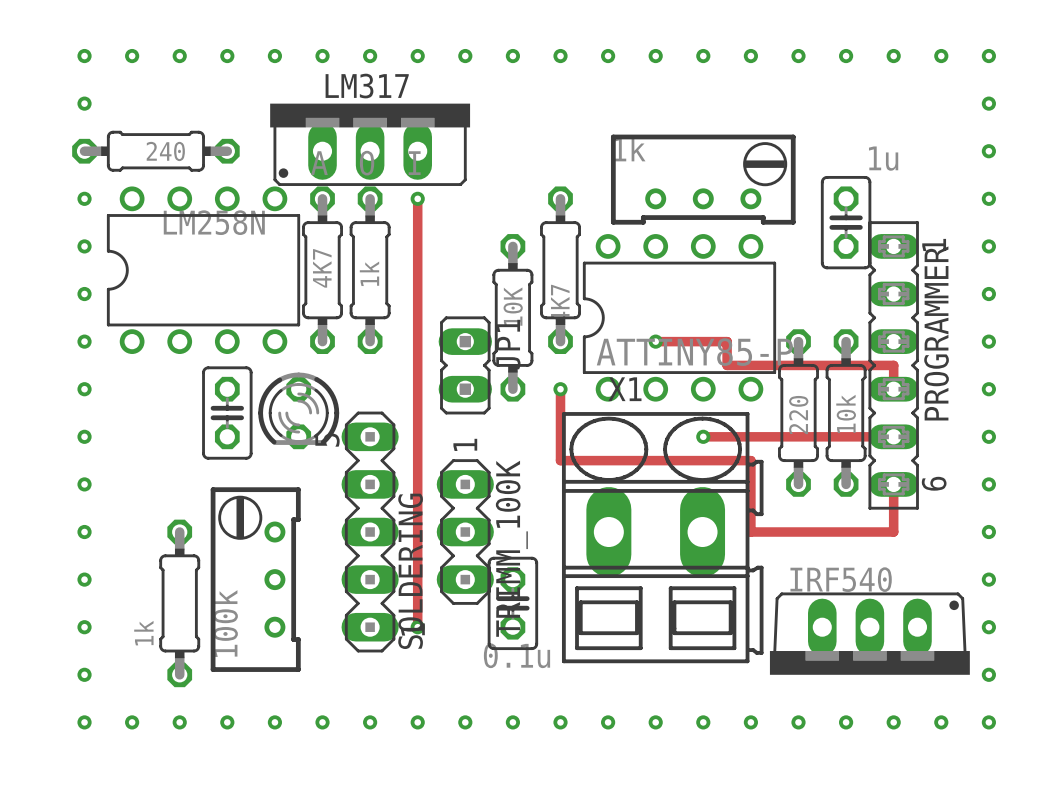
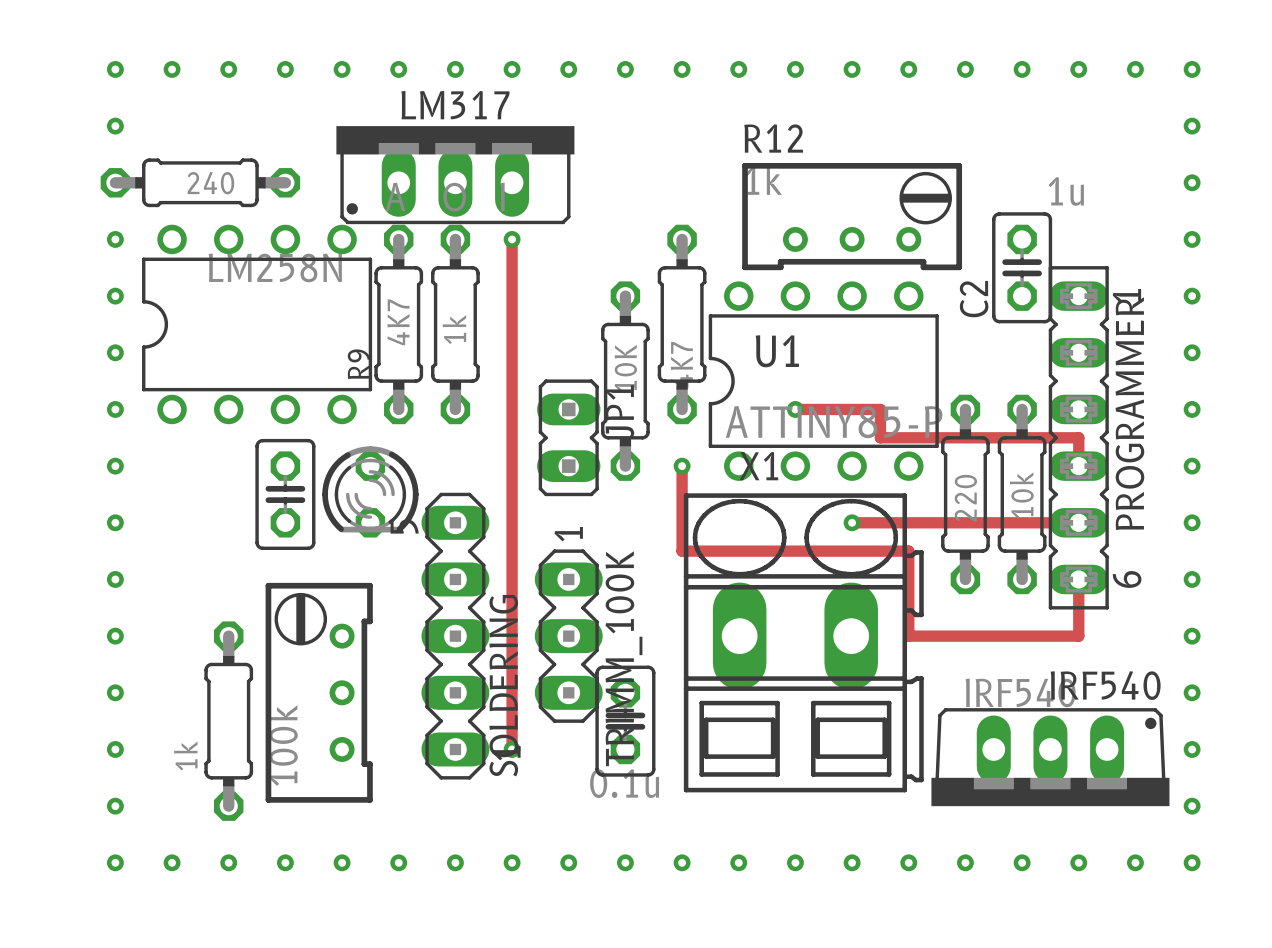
R12 name: none -> R12 (773, 138)
C2 name: none -> C2 (974, 299)
U1 name: none -> U1 (777, 351)
R9 name: none -> R9 (358, 364)
IRF540 name: none -> IRF540 (1105, 685)

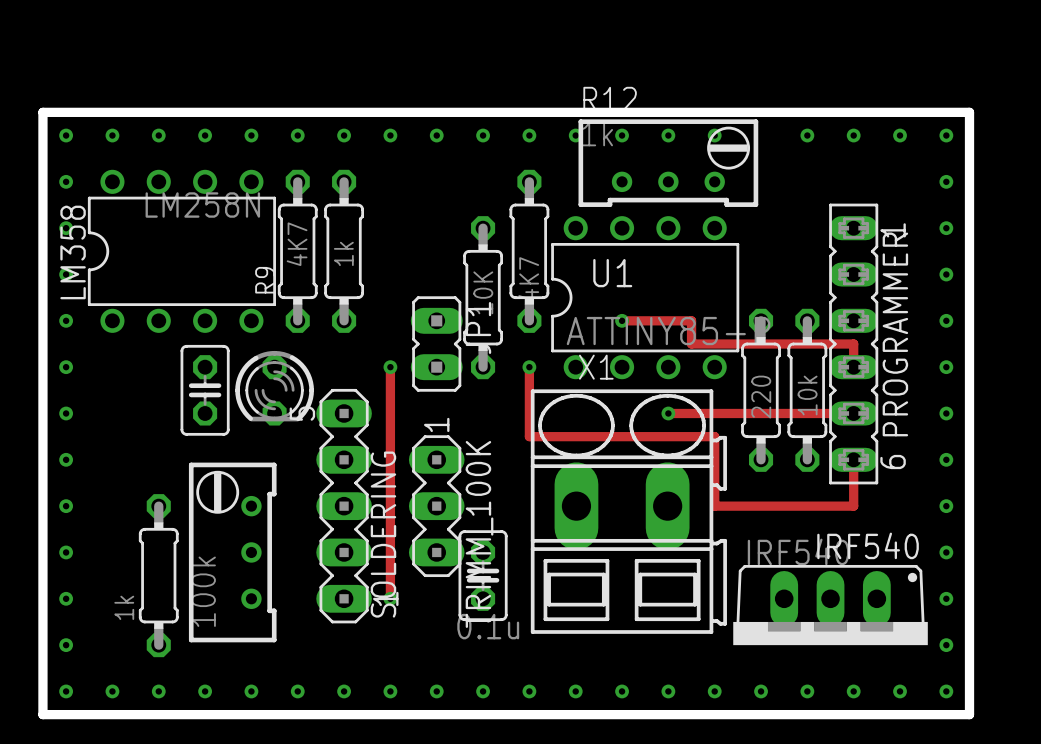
via: (115, 69) -> none
via: (172, 69) -> none
via: (228, 69) -> none
via: (285, 69) -> none
via: (342, 69) -> none
via: (398, 69) -> none
via: (455, 69) -> none
via: (512, 69) -> none
via: (568, 69) -> none
via: (625, 69) -> none
via: (682, 69) -> none
via: (738, 69) -> none
via: (795, 69) -> none
via: (852, 69) -> none
via: (908, 69) -> none
via: (965, 69) -> none
via: (1022, 69) -> none
via: (1078, 69) -> none
via: (1135, 69) -> none
via: (1192, 69) -> none
via: (115, 126) -> none
via: (1192, 126) -> none
board edge: none -> (42, 112) (969, 112) (969, 714) (42, 714) (42, 112)
LM317: (455, 175) -> none
via: none -> (66, 135)
via: none -> (112, 135)
part: 240 (200, 182) -> none
via: none -> (158, 135)
via: none -> (205, 135)
via: none -> (251, 135)
via: none -> (297, 135)
via: none -> (344, 135)
via: none -> (390, 135)
via: none -> (436, 135)
via: none -> (483, 135)
via: none -> (529, 135)
via: none -> (575, 135)
via: none -> (622, 135)
via: none -> (668, 135)
via: none -> (714, 135)
via: none -> (807, 135)
via: none -> (853, 135)
via: none -> (900, 135)
track: (512, 239) (512, 466) -> none
via: (512, 239) -> none
C2: 1u (1022, 267) -> none
LM358 name: none -> LM358 (73, 252)
via: none -> (390, 367)

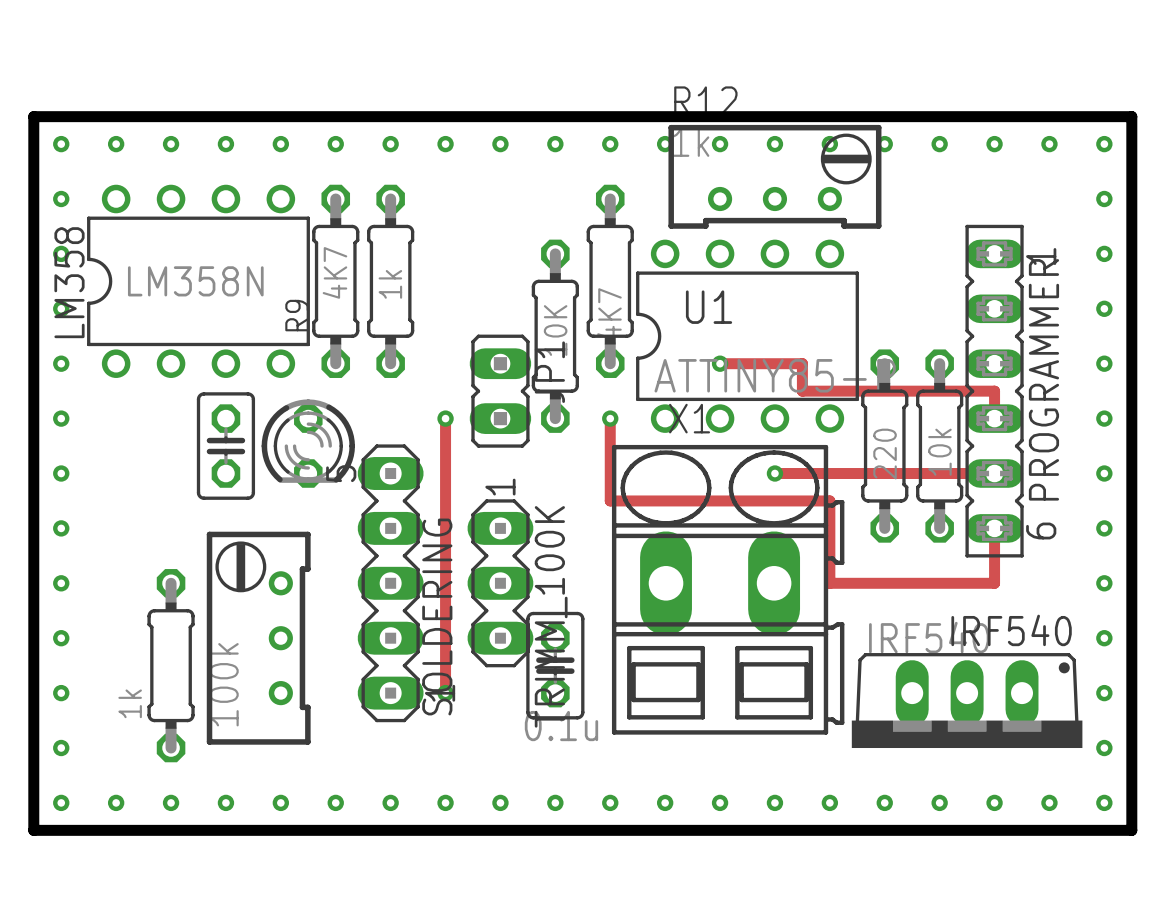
via: none -> (884, 144)
LM358 value: LM258N (202, 205) -> LM358N (195, 281)

